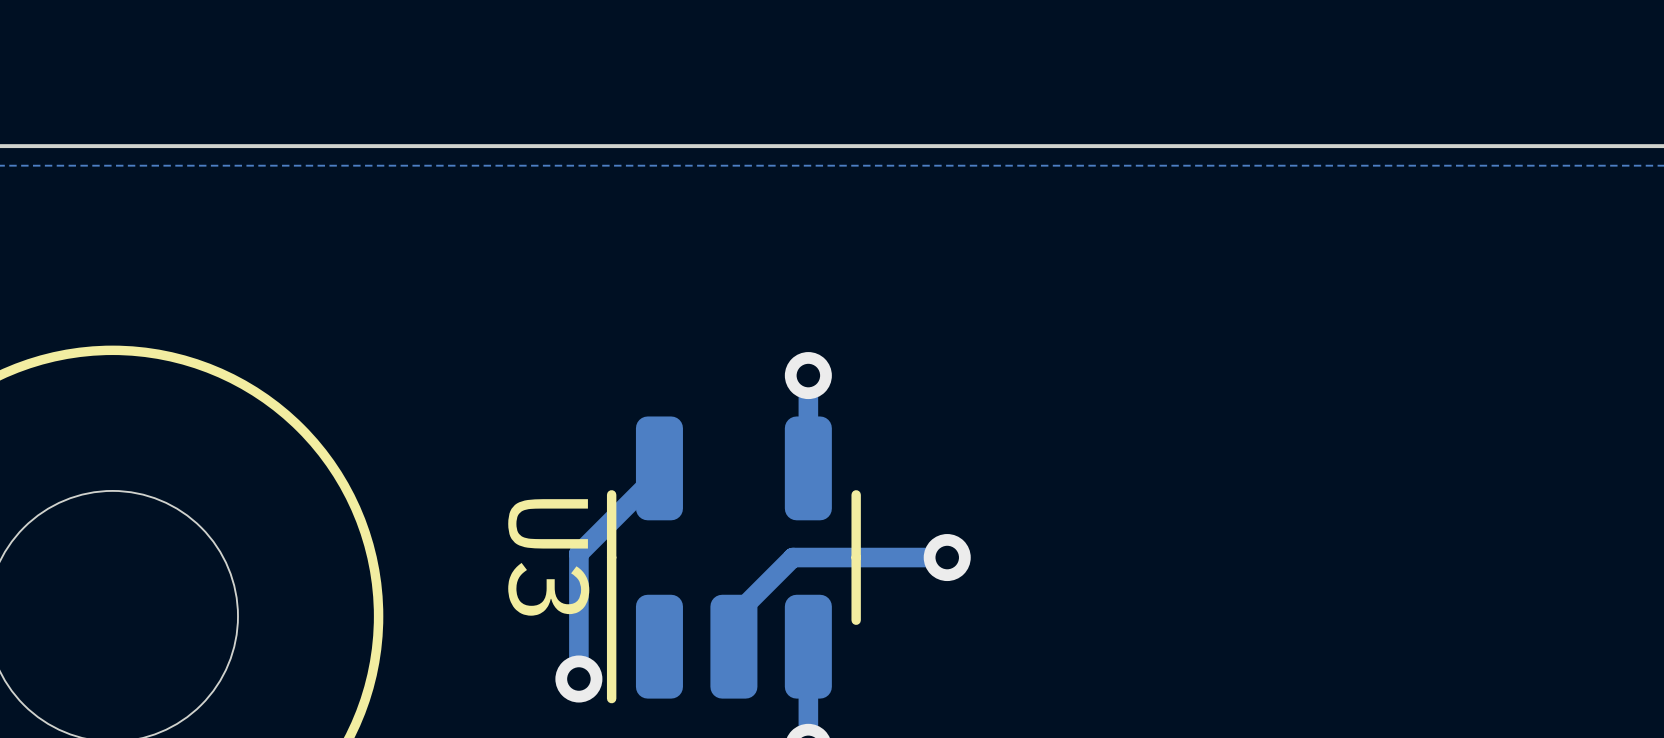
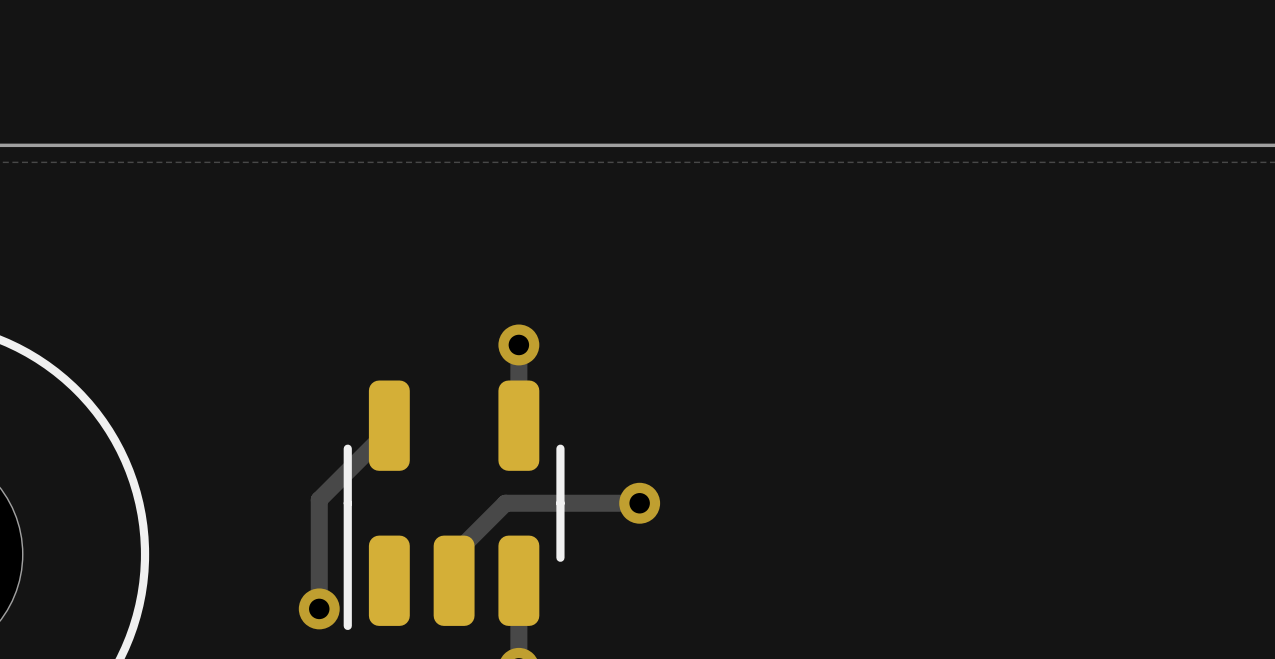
U3 name: U3 (548, 557) -> none

